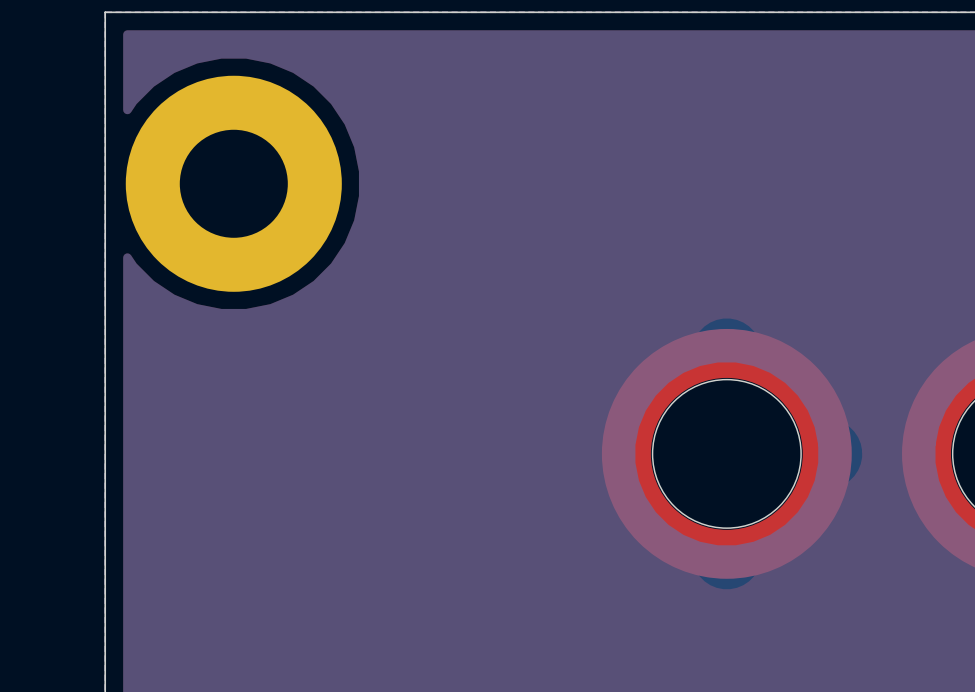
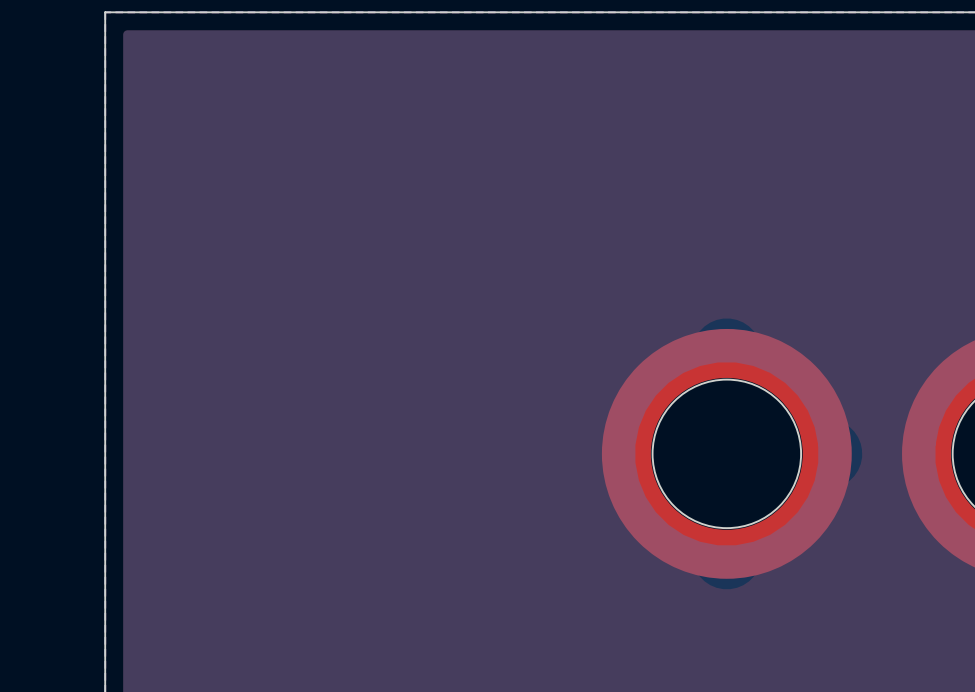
part: (233, 183) -> none

